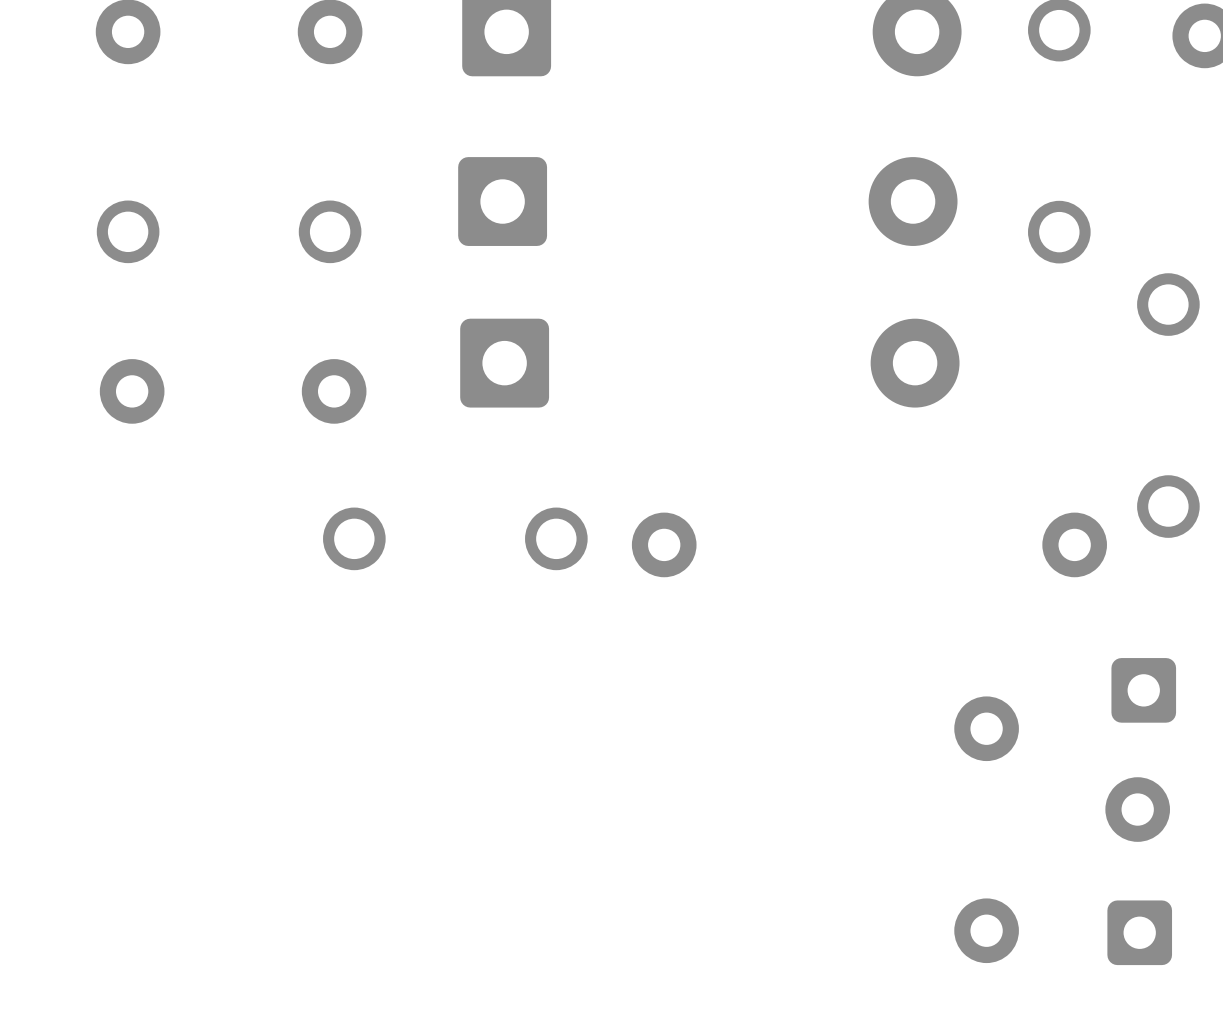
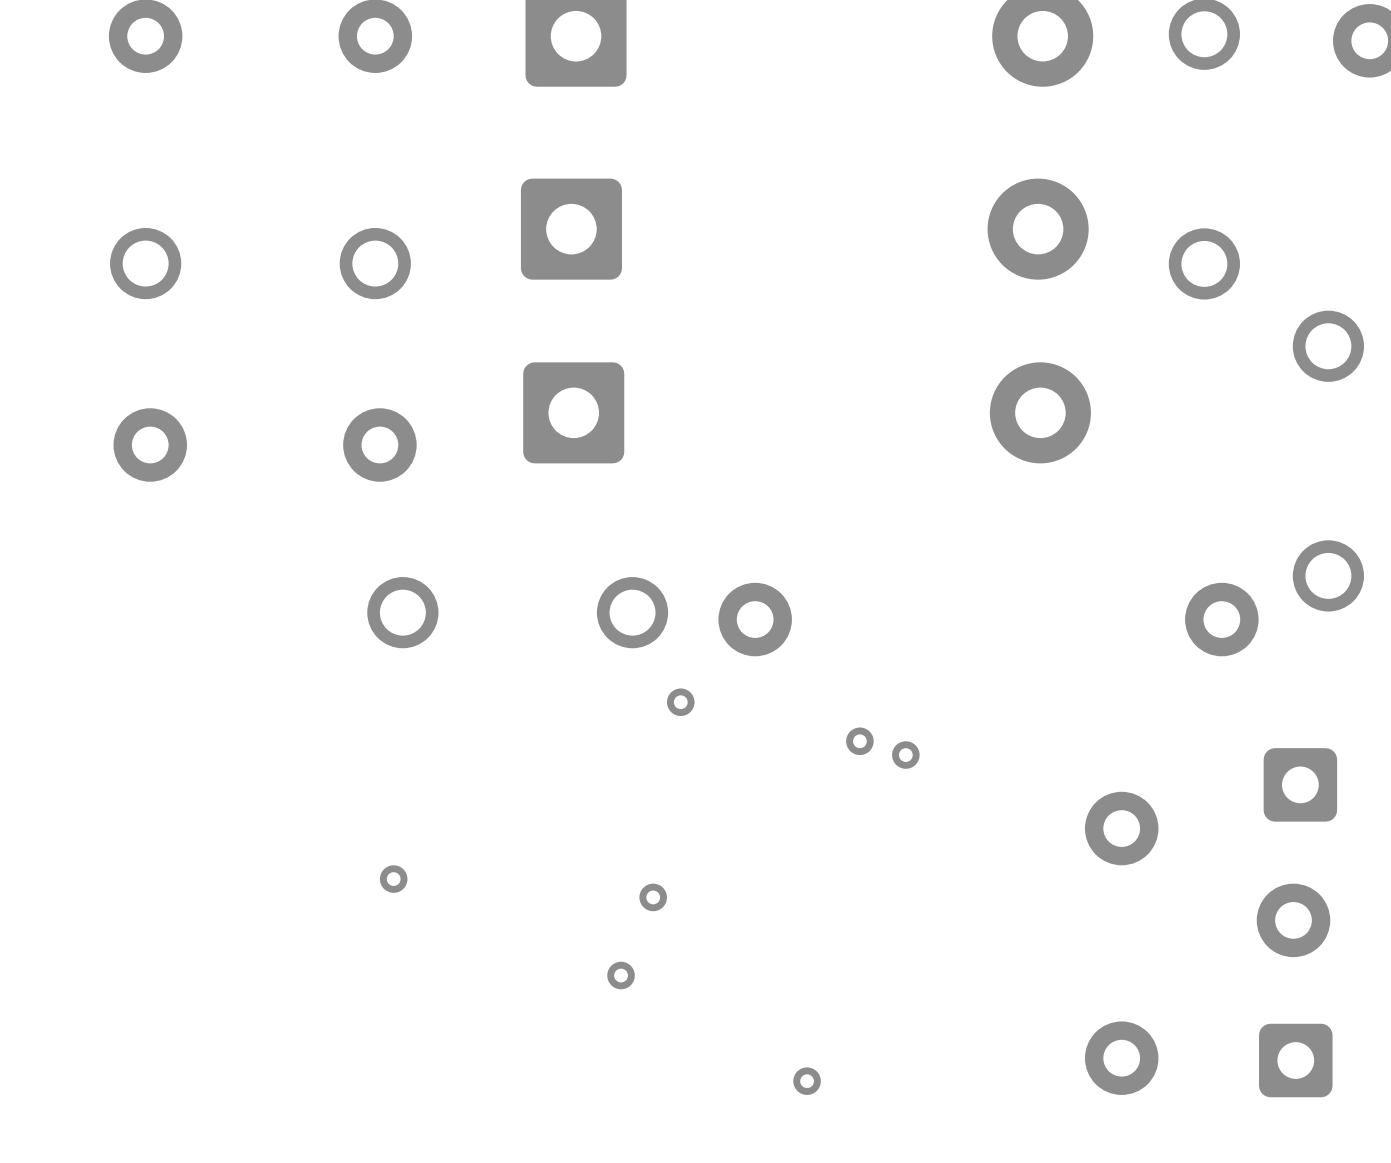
via: none -> (680, 702)
via: none -> (859, 741)
via: none -> (905, 755)
via: none -> (393, 879)
via: none -> (653, 897)
via: none -> (621, 975)
via: none -> (807, 1081)

